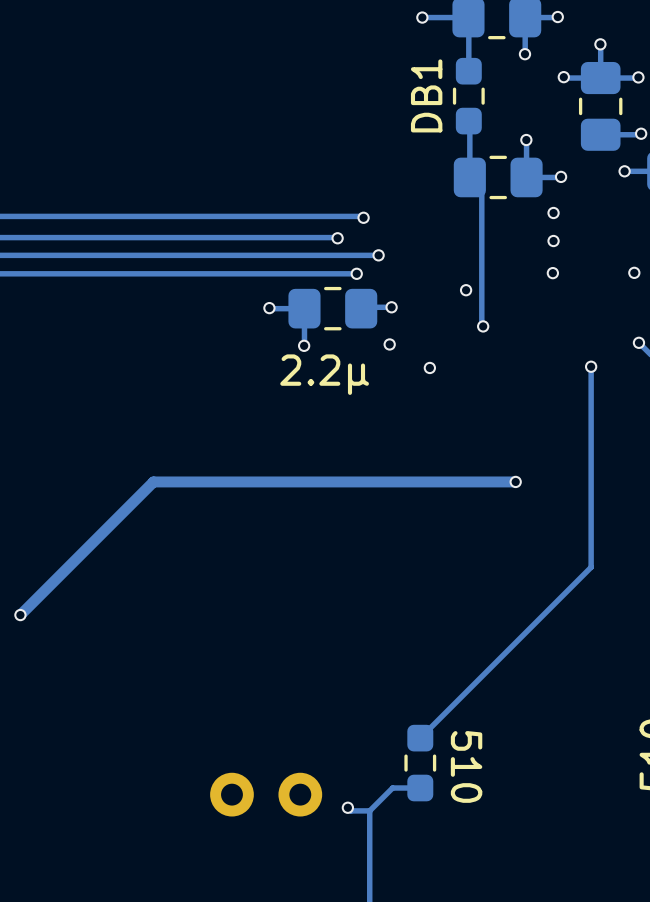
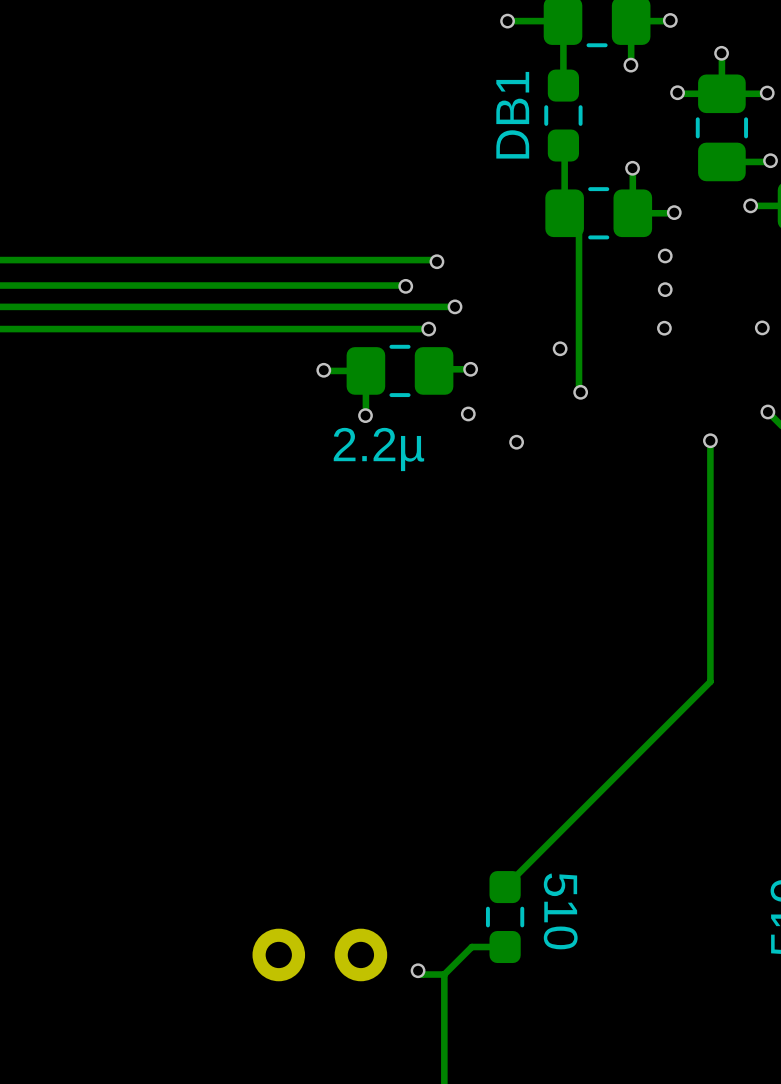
track: (515, 481) (153, 481) (20, 615) -> none
via: (515, 481) -> none
via: (20, 615) -> none

